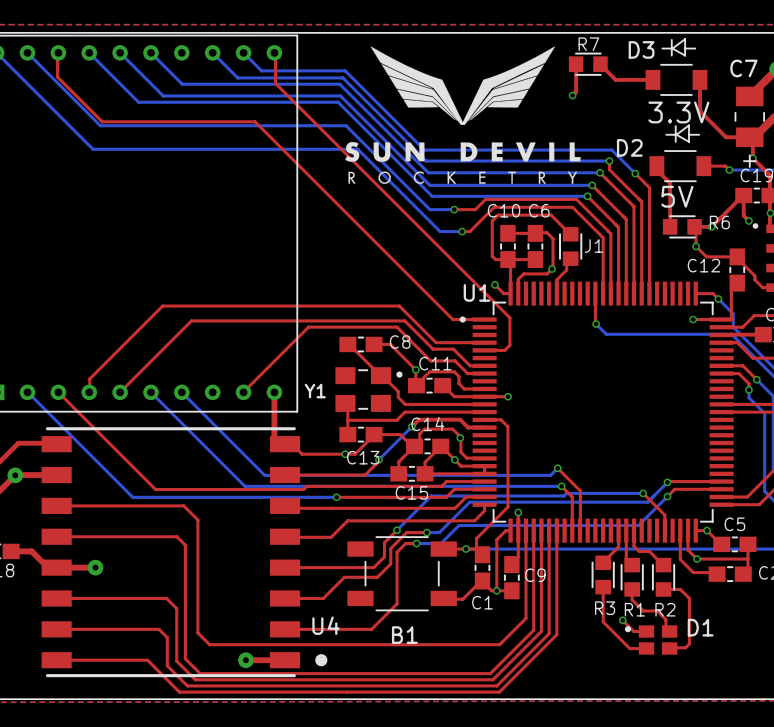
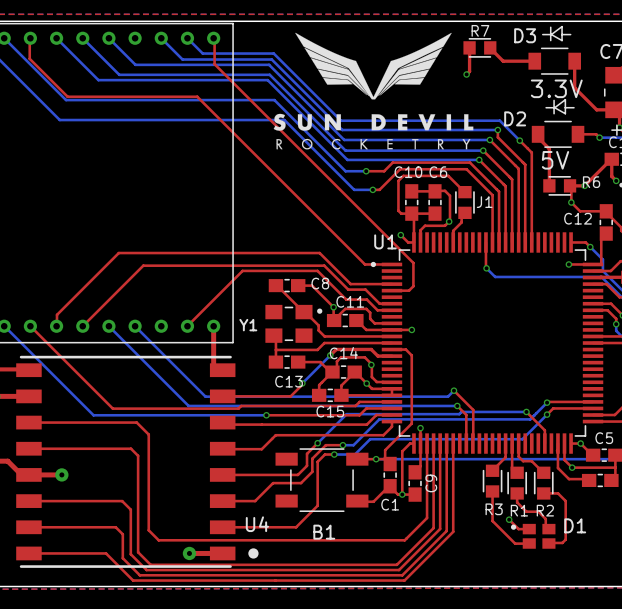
top track: (374, 434) (355, 454) (302, 454) (298, 450) -> none
via: (345, 454) -> none
C9 name rotation: 0° (535, 575) -> 90° counterclockwise (431, 483)

